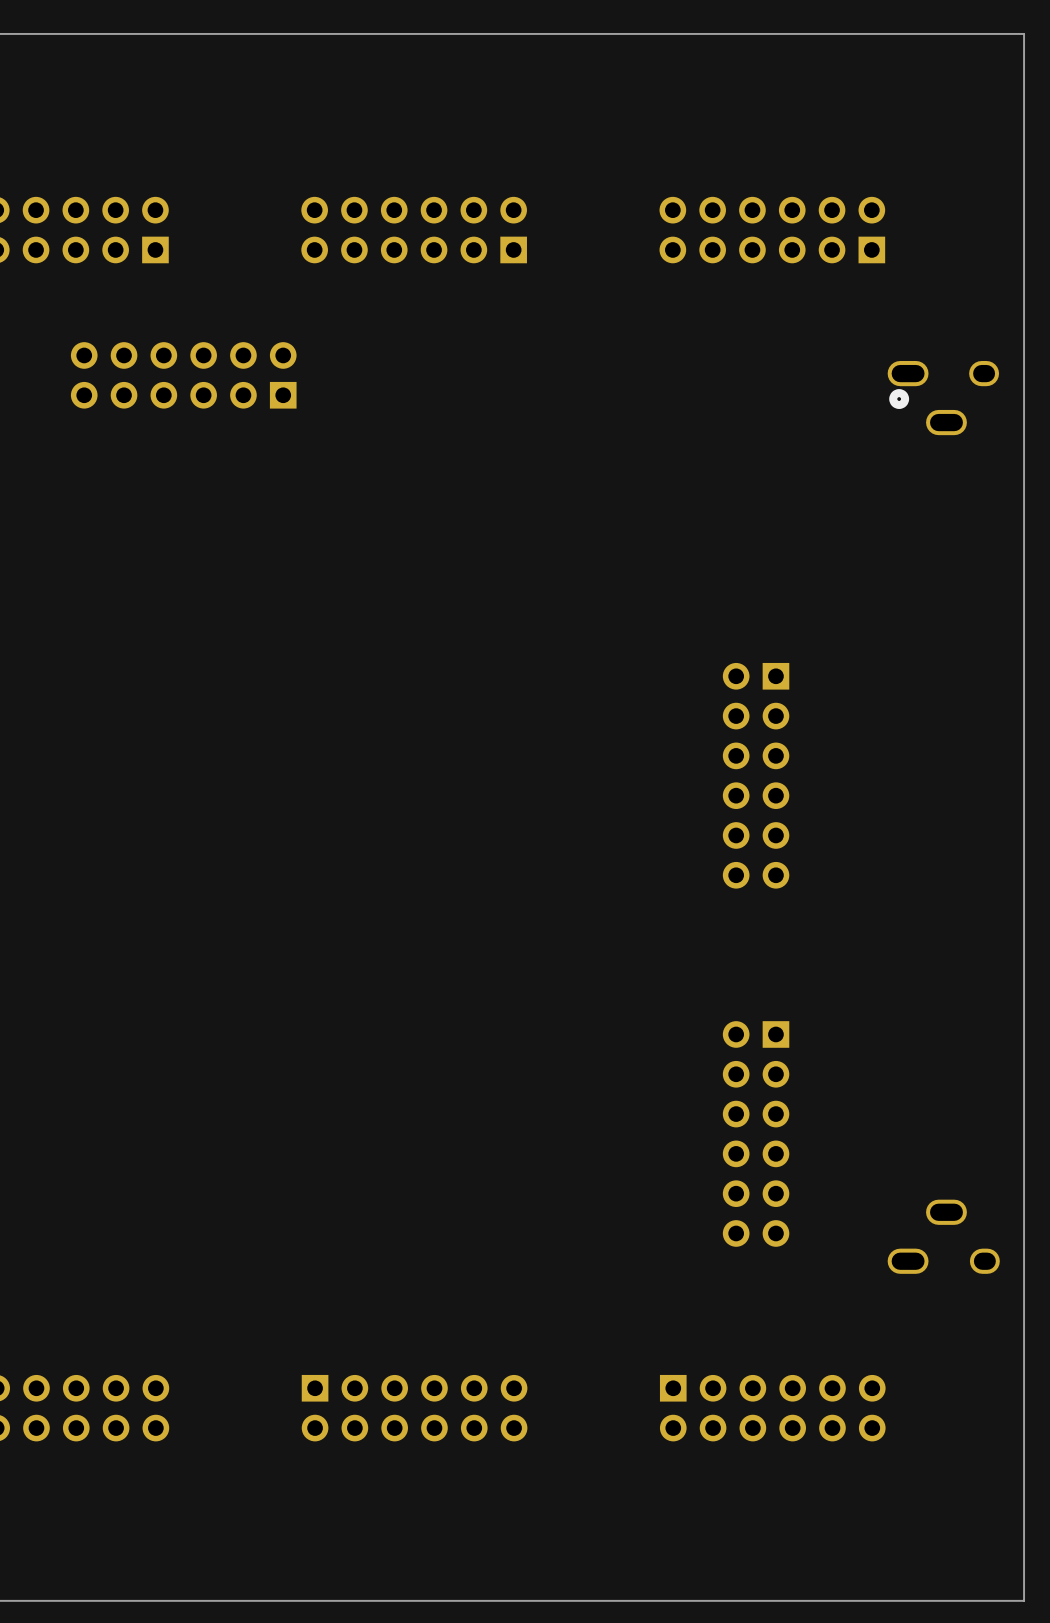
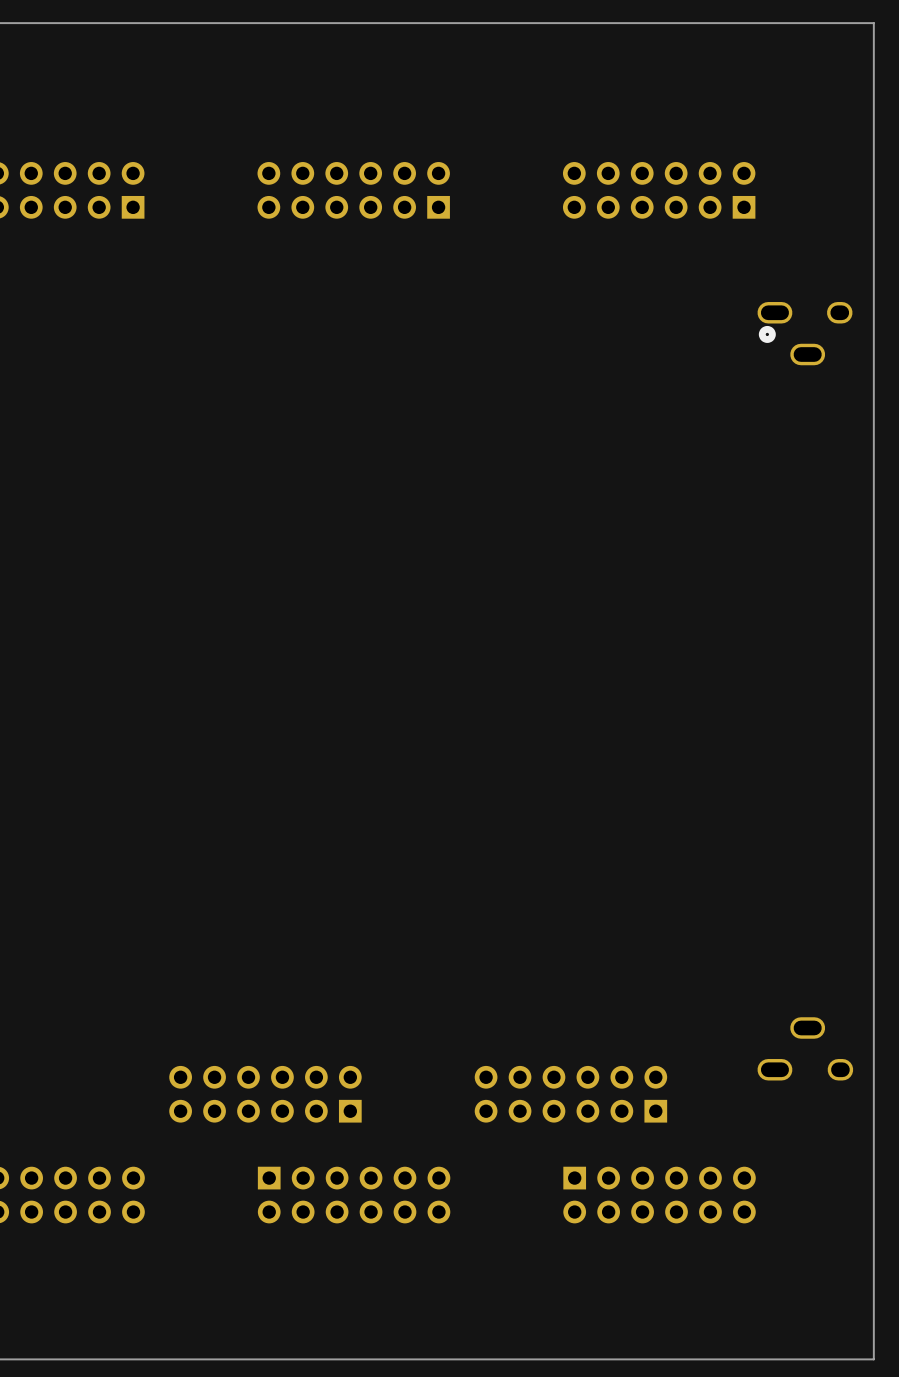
part: (183, 375) -> none
part: (756, 775) -> none
part rotation: 0° (756, 1133) -> 90° clockwise (570, 1094)
part position: (756, 1133) -> (570, 1094)
part: none -> (265, 1094)

